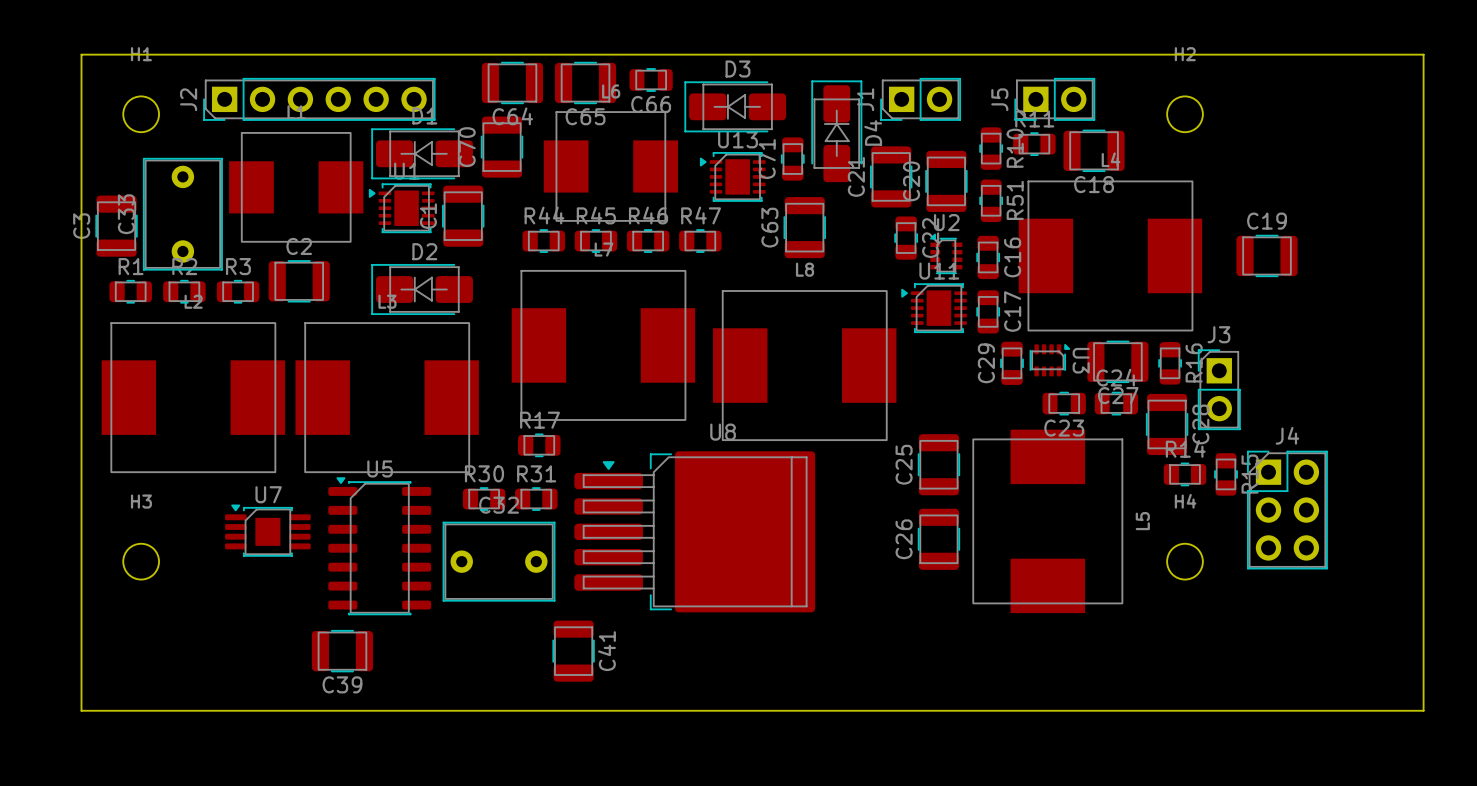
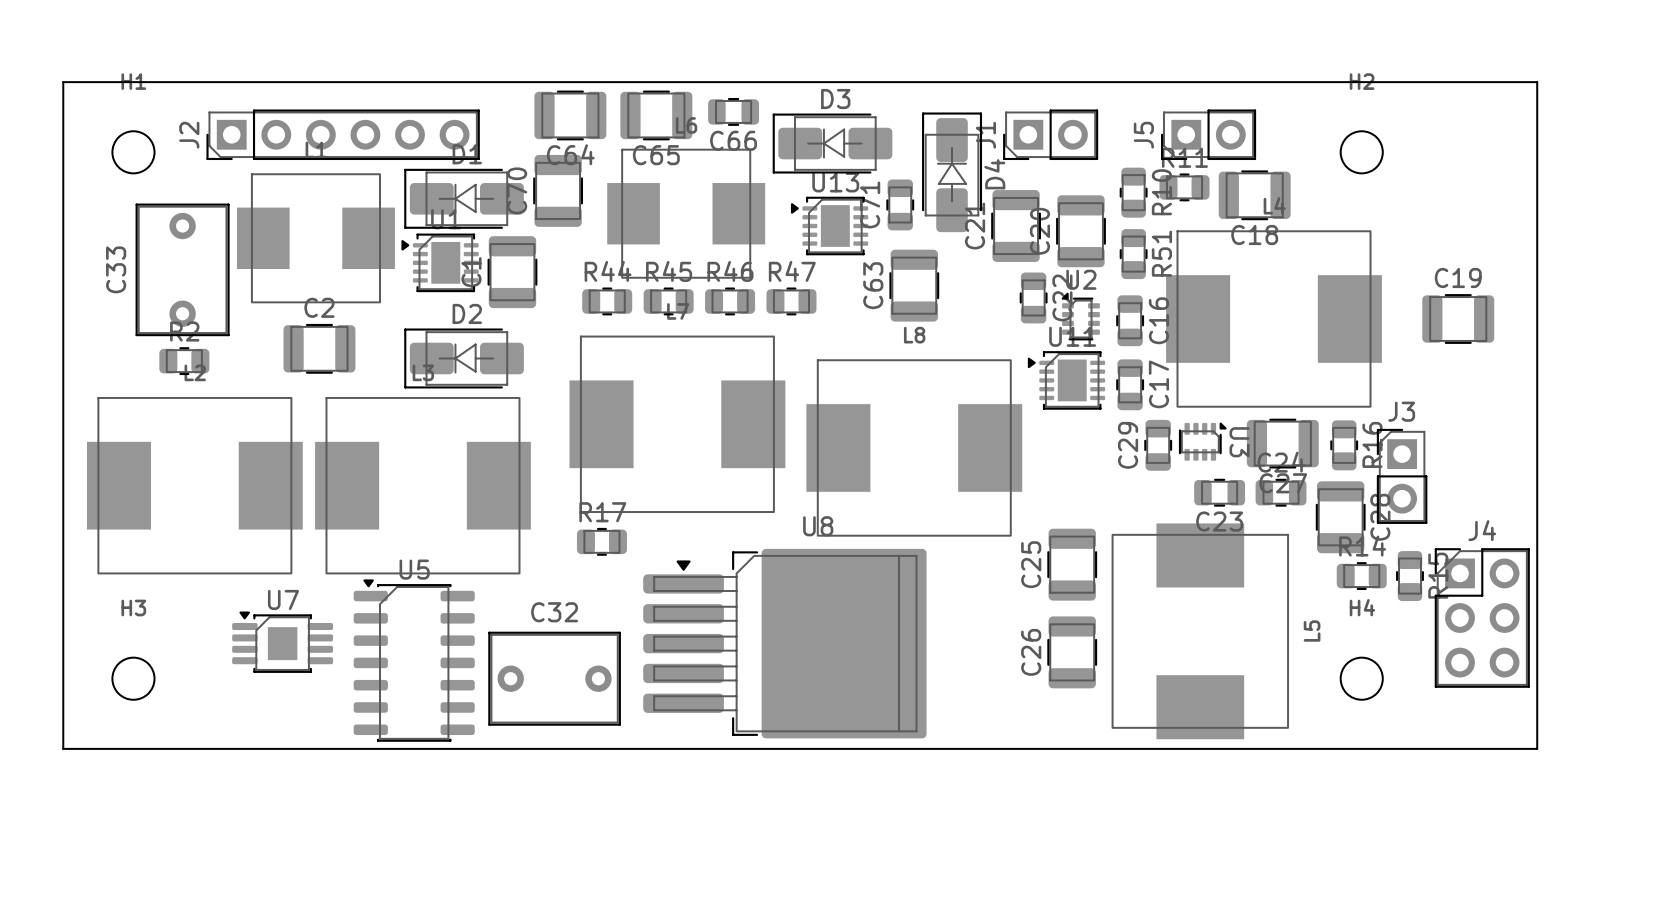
board edge: (1334, 54) (1423, 54) (1423, 710) (81, 710) (81, 621) -> (1537, 82) (1537, 748) (63, 748)
C3: (116, 226) -> none
R1: (130, 291) -> none
R3: (238, 291) -> none
R30: (484, 499) -> none
R31: (536, 499) -> none
C39: (342, 651) -> none
C41: (573, 651) -> none

